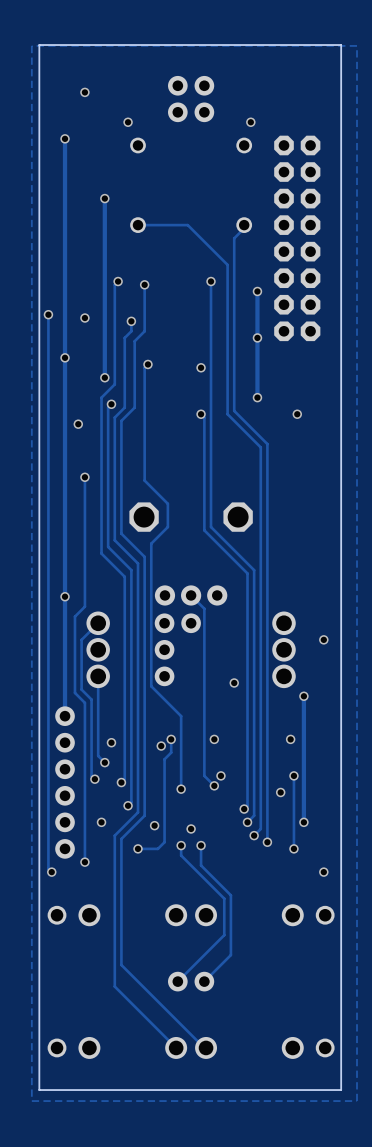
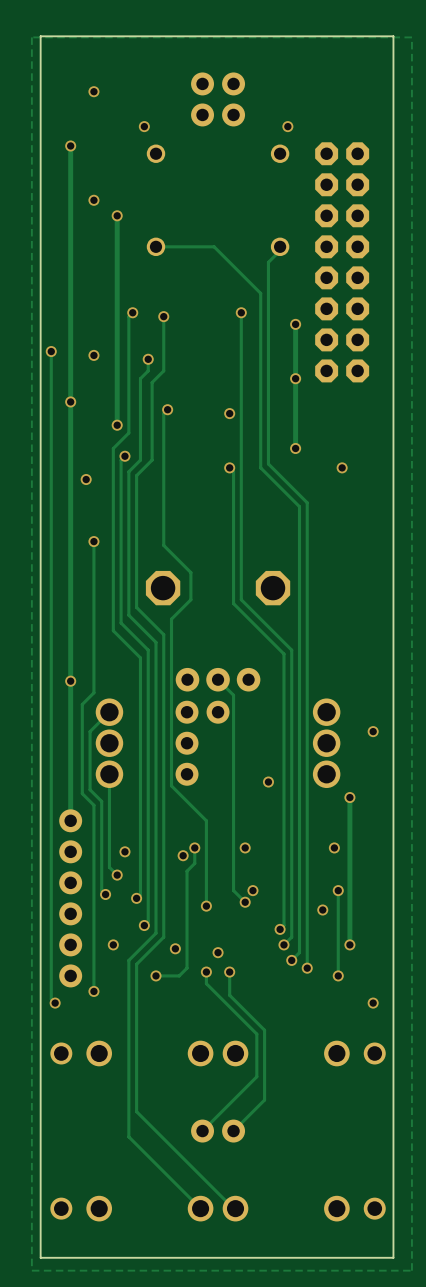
via: none -> (93, 200)

